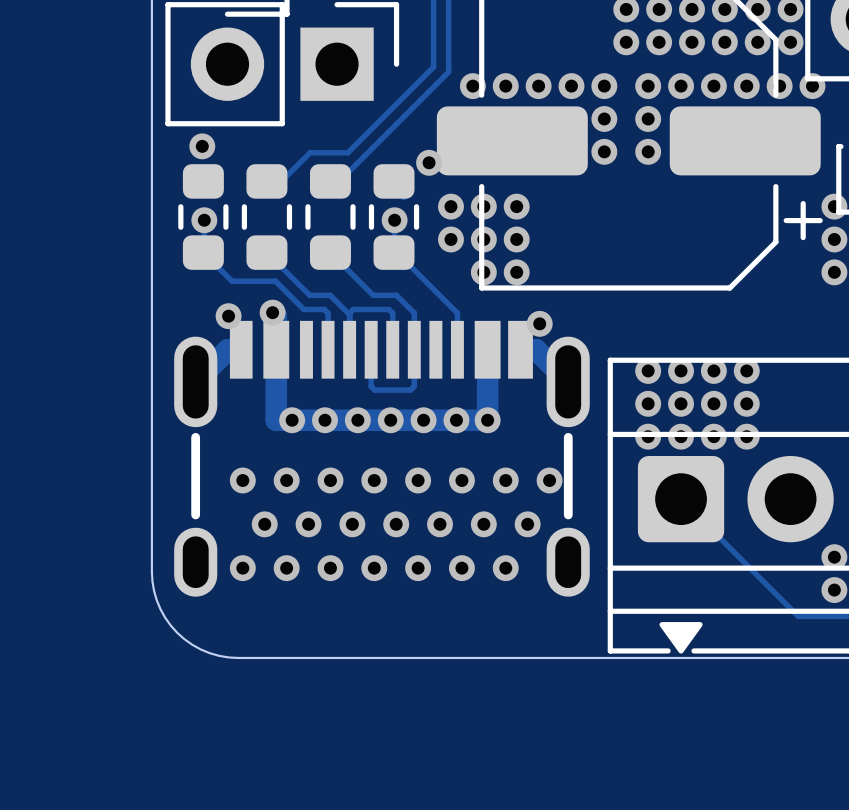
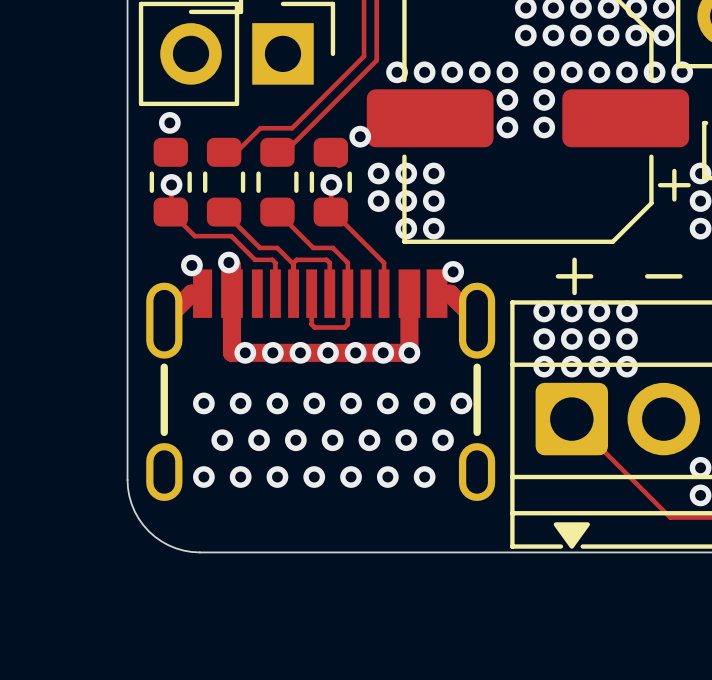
text: none -> + (574, 276)
text: none -> - (663, 276)

